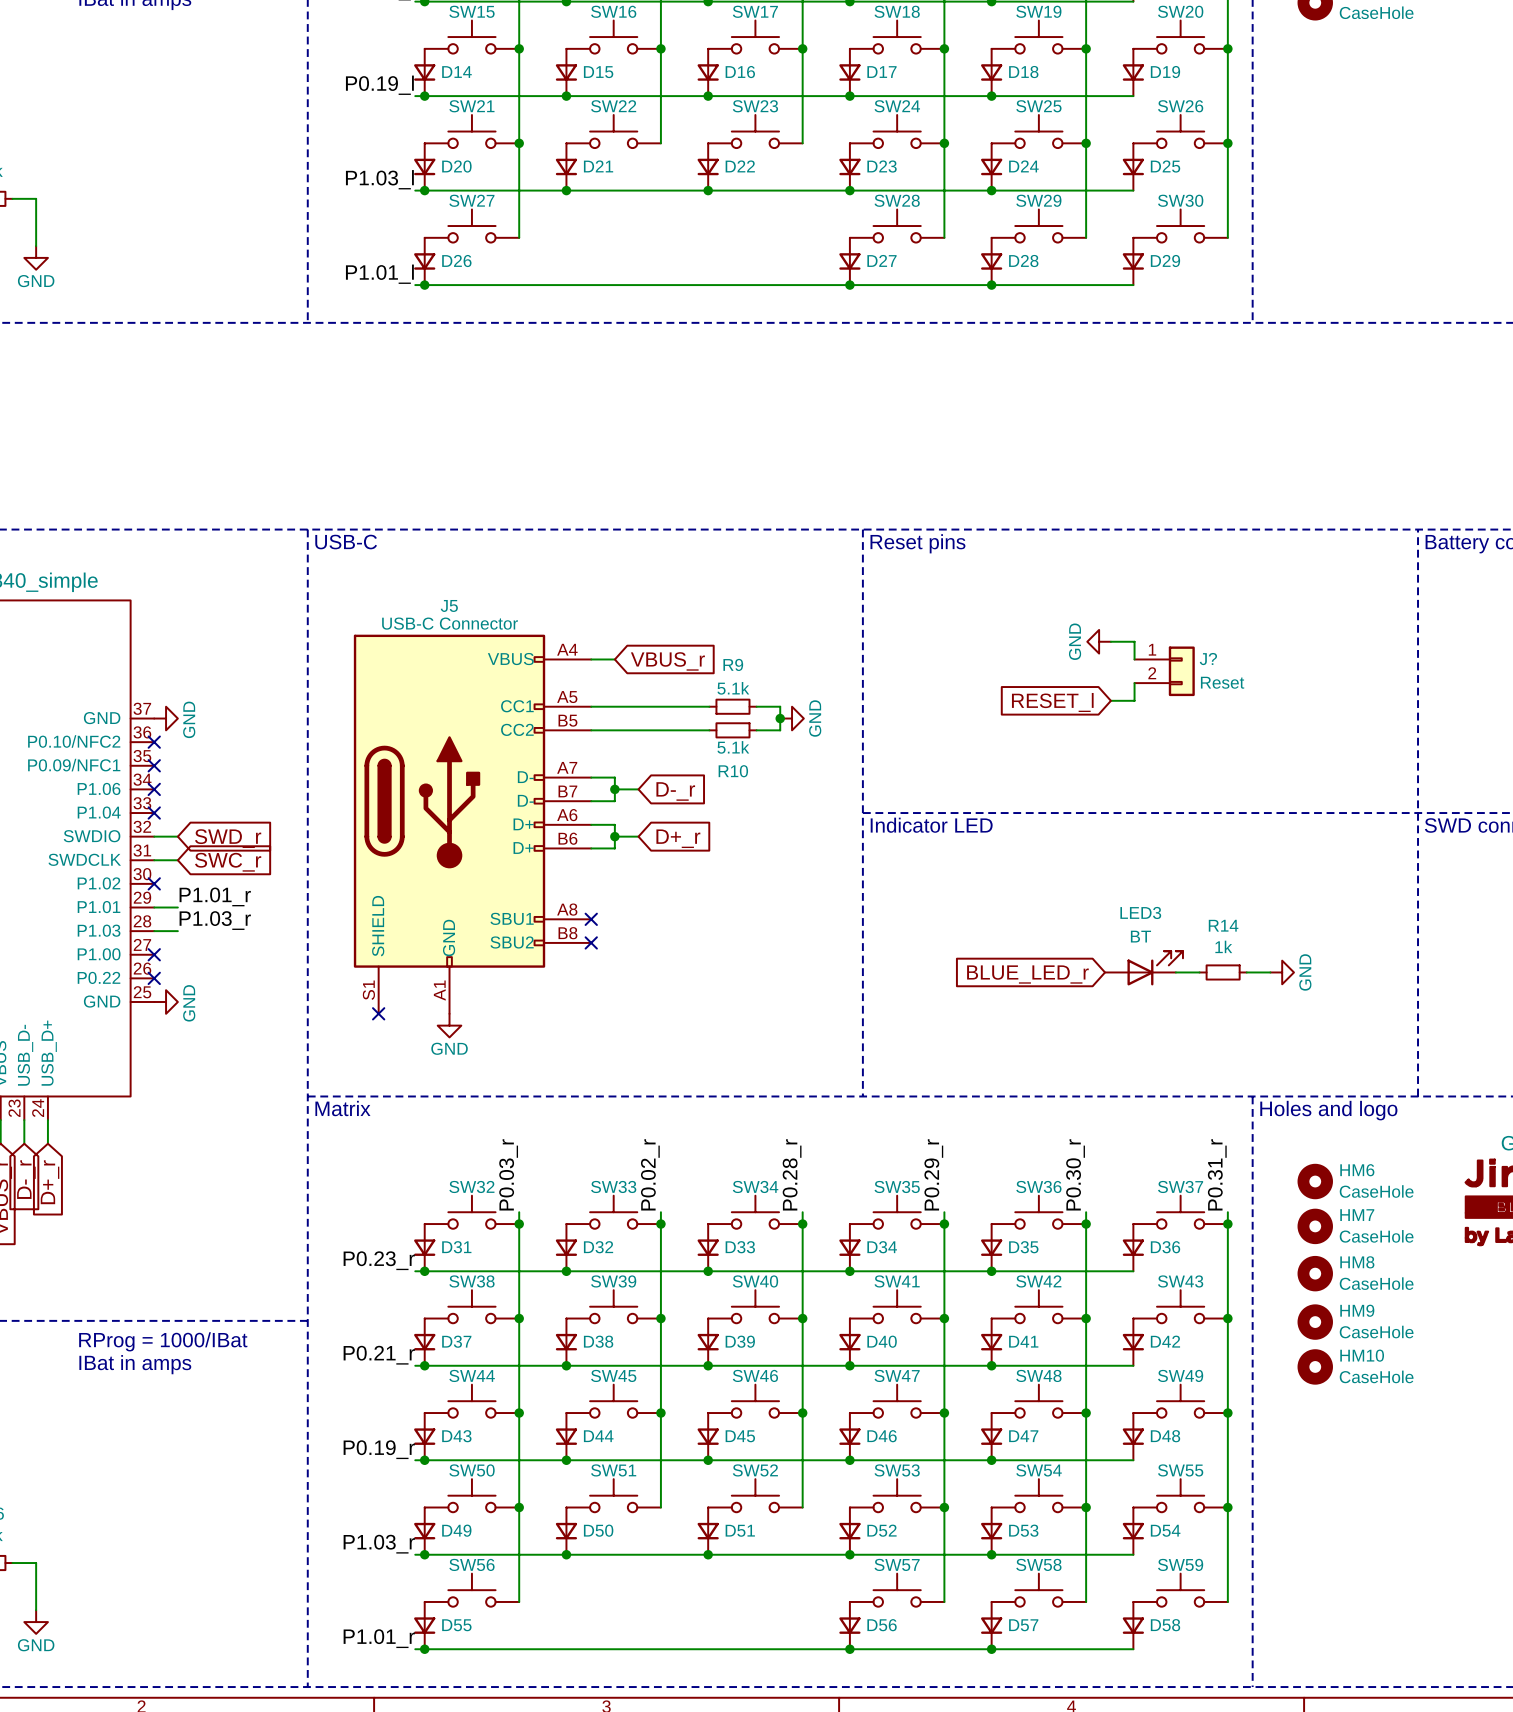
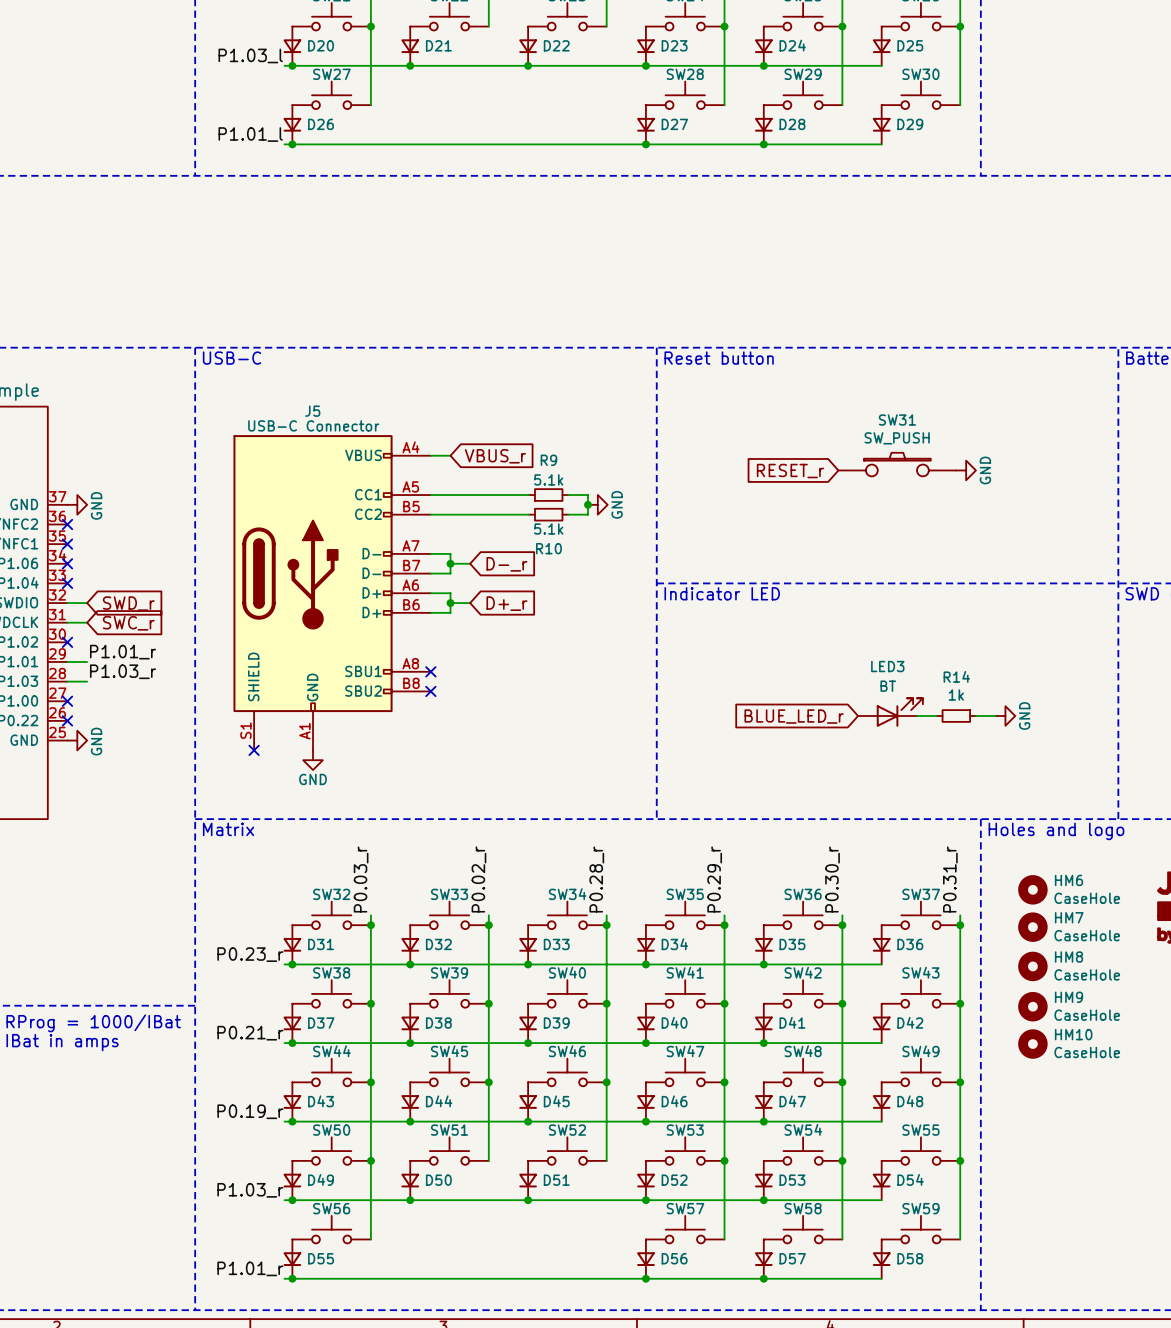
text: Reset pins (917, 543) -> Reset button (719, 358)
power symbol rotation: 0° (1099, 641) -> 180° (966, 470)
power symbol position: GND (1099, 641) -> GND (966, 470)
wire: (1110, 641) (1134, 641) (1134, 659) -> none
SW31: none -> SW_PUSH (897, 464)
J?: Reset (1164, 671) -> none
wire: (1134, 683) (1134, 700) (1110, 700) -> none
global label: RESET_l (1052, 702) -> RESET_r (790, 471)

